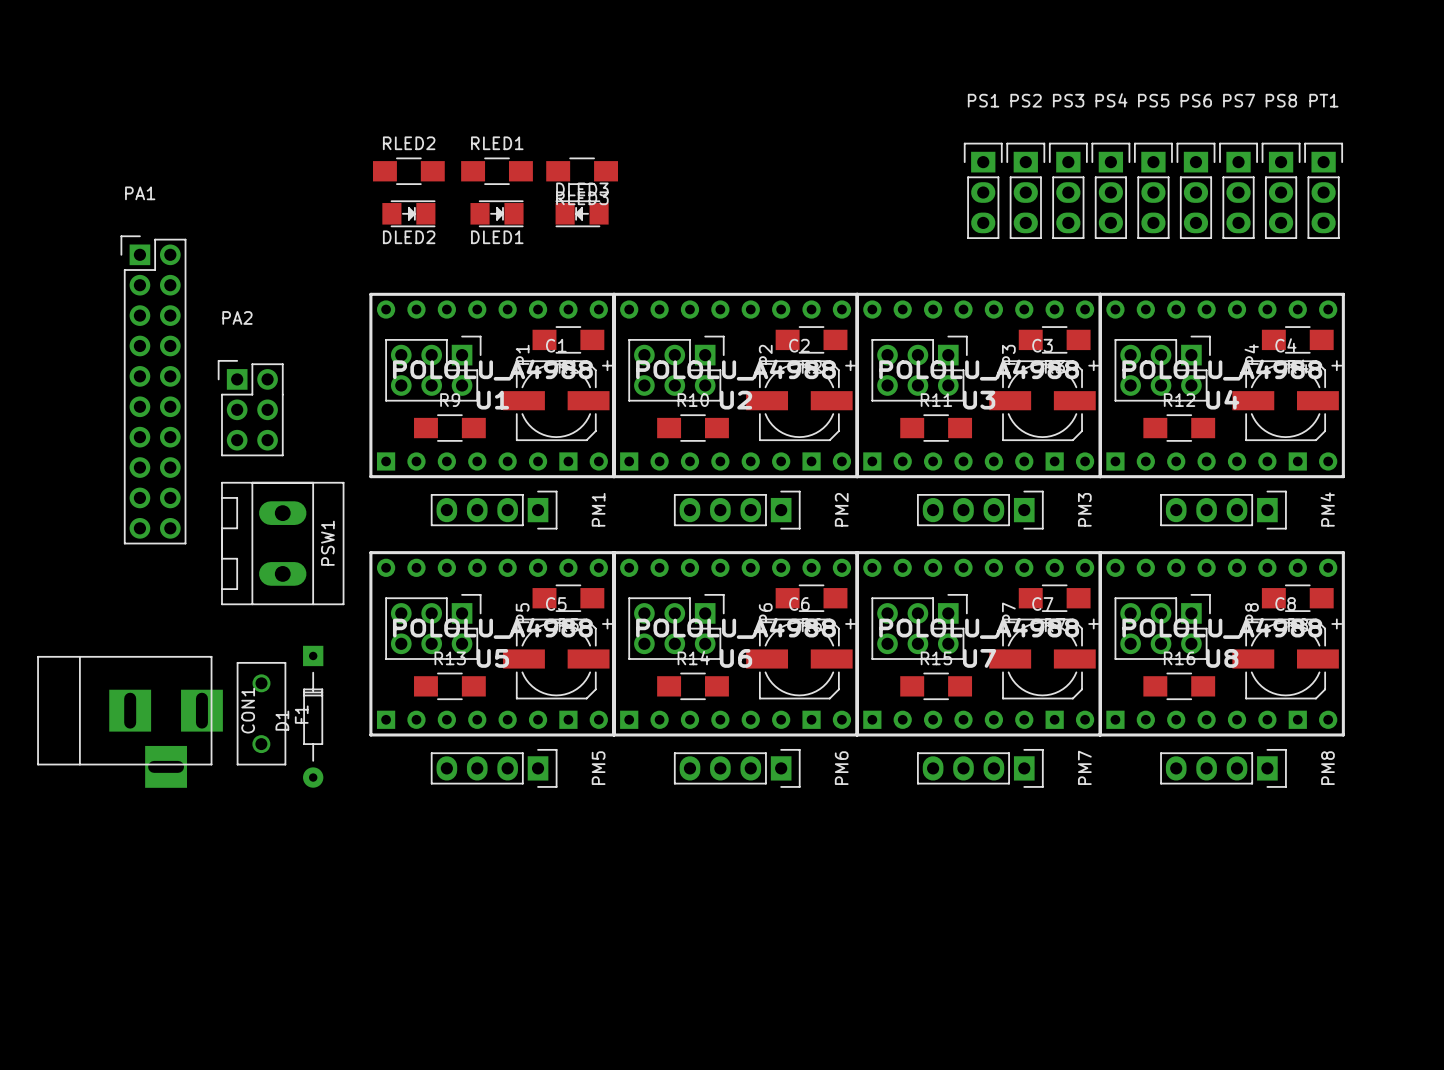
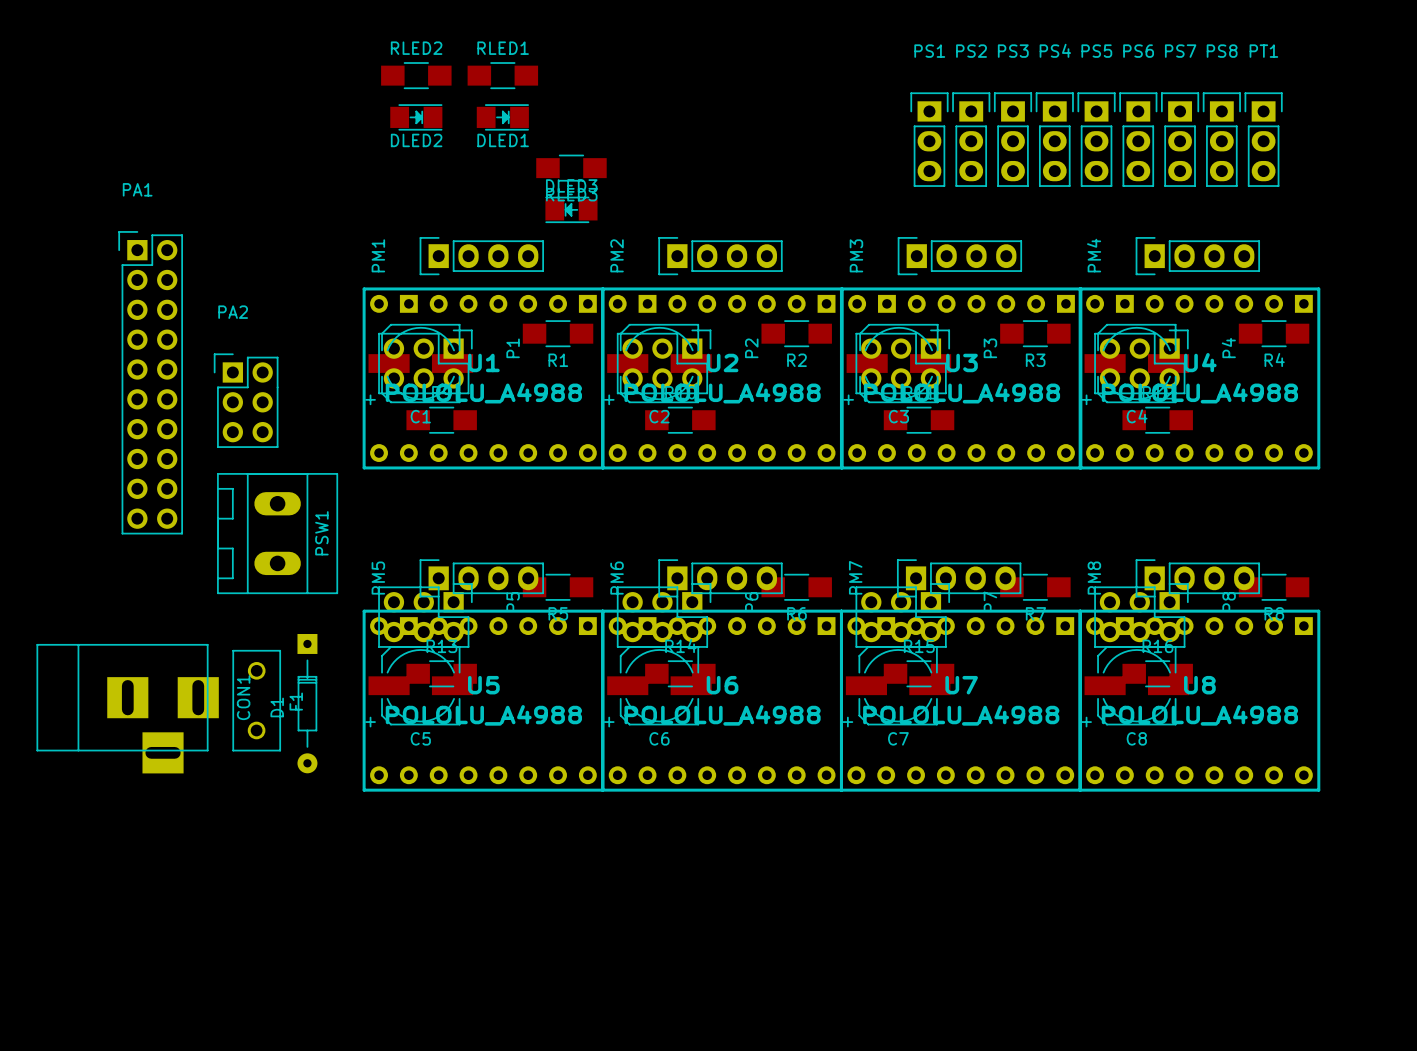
RLED2 position: (408, 171) -> (416, 75)
RLED1 position: (497, 171) -> (502, 75)
PS1 position: (983, 190) -> (929, 139)
PS2 position: (1025, 190) -> (971, 139)
PS3 position: (1068, 190) -> (1013, 139)
PS4 position: (1110, 190) -> (1054, 139)
PS5 position: (1153, 190) -> (1096, 139)
PS6 position: (1195, 190) -> (1138, 139)
PS7 position: (1238, 190) -> (1180, 139)
PS8 position: (1281, 190) -> (1221, 139)
PT1 position: (1323, 190) -> (1263, 139)
DLED2 position: (408, 213) -> (416, 117)
DLED1 position: (497, 213) -> (502, 117)
U1 rotation: 0° (492, 385) -> 180° (483, 378)
U2 rotation: 0° (735, 385) -> 180° (722, 378)
U3 rotation: 0° (978, 385) -> 180° (961, 378)
U4 rotation: 0° (1221, 385) -> 180° (1199, 378)
C1 rotation: 0° (556, 400) -> 180° (420, 363)
C1 position: (556, 400) -> (420, 363)
C2 rotation: 0° (799, 400) -> 180° (659, 363)
C2 position: (799, 400) -> (659, 363)
C3 rotation: 0° (1042, 400) -> 180° (898, 363)
C3 position: (1042, 400) -> (898, 363)
C4 rotation: 0° (1285, 400) -> 180° (1136, 363)
C4 position: (1285, 400) -> (1136, 363)
PM1 rotation: 0° (494, 510) -> 180° (481, 256)
PM1 position: (494, 510) -> (481, 256)
PM2 rotation: 0° (737, 510) -> 180° (720, 256)
PM2 position: (737, 510) -> (720, 256)
PM3 rotation: 0° (980, 510) -> 180° (959, 256)
PM3 position: (980, 510) -> (959, 256)
PM4 rotation: 0° (1223, 510) -> 180° (1197, 256)
PM4 position: (1223, 510) -> (1197, 256)
U5 rotation: 0° (492, 643) -> 180° (483, 700)
U6 rotation: 0° (735, 643) -> 180° (722, 700)
U7 rotation: 0° (978, 643) -> 180° (960, 700)
U8 rotation: 0° (1221, 643) -> 180° (1199, 700)
C5 rotation: 0° (556, 659) -> 180° (420, 685)
C5 position: (556, 659) -> (420, 685)
C6 rotation: 0° (799, 659) -> 180° (659, 685)
C6 position: (799, 659) -> (659, 685)
C7 rotation: 0° (1042, 659) -> 180° (898, 685)
C7 position: (1042, 659) -> (898, 685)
C8 rotation: 0° (1285, 659) -> 180° (1136, 685)
C8 position: (1285, 659) -> (1136, 685)
PM5 rotation: 0° (494, 768) -> 180° (481, 578)
PM5 position: (494, 768) -> (481, 578)
PM6 rotation: 0° (737, 768) -> 180° (720, 578)
PM6 position: (737, 768) -> (720, 578)
PM7 rotation: 0° (980, 768) -> 180° (959, 578)
PM7 position: (980, 768) -> (959, 578)
PM8 rotation: 0° (1223, 768) -> 180° (1197, 578)
PM8 position: (1223, 768) -> (1197, 578)

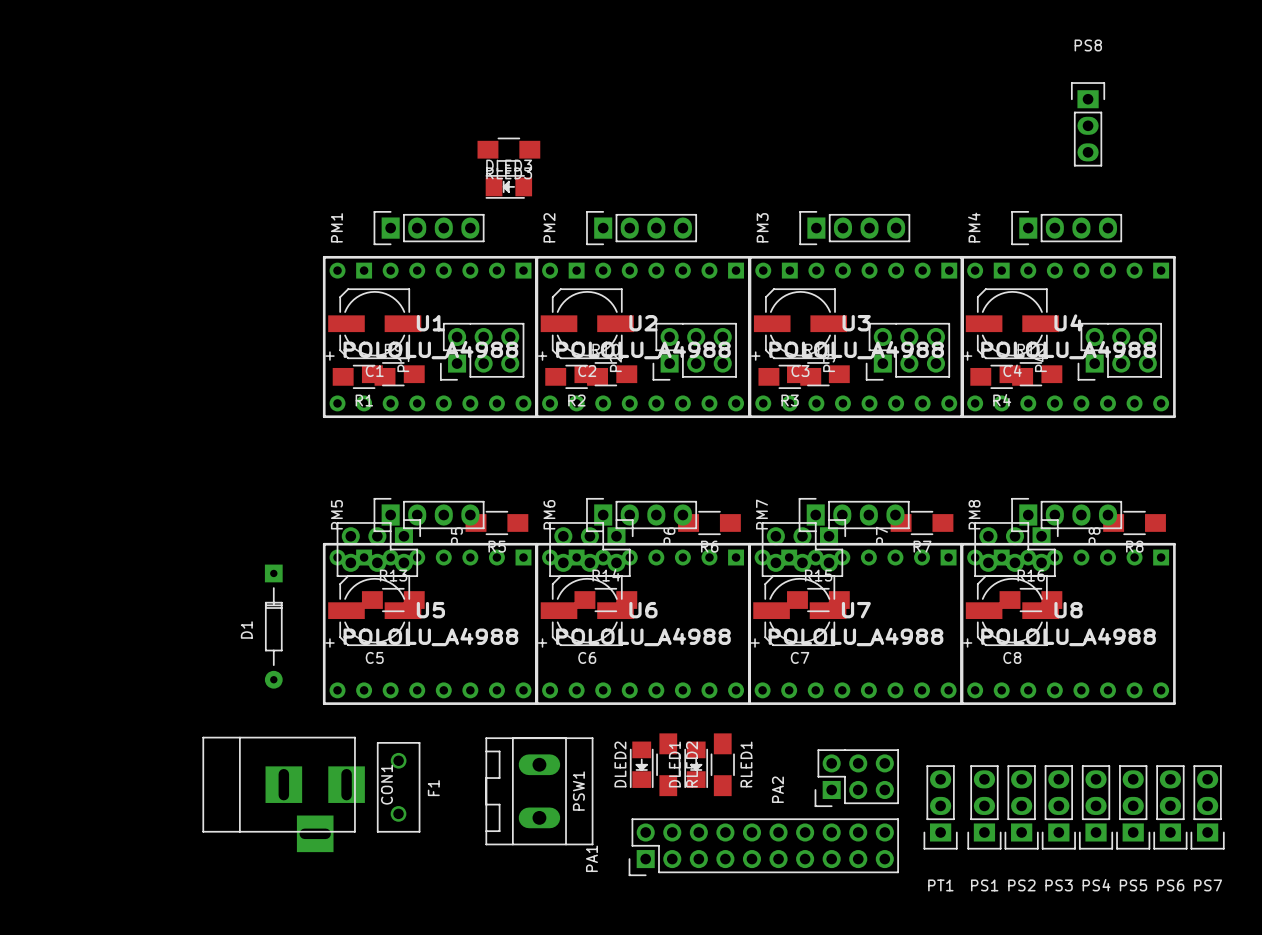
RLED2 rotation: 0° (416, 75) -> 90° clockwise (668, 764)
RLED2 position: (416, 75) -> (668, 764)
RLED1 rotation: 0° (502, 75) -> 90° clockwise (722, 764)
RLED1 position: (502, 75) -> (722, 764)
DLED2 rotation: 0° (416, 117) -> 90° clockwise (641, 764)
DLED2 position: (416, 117) -> (641, 764)
DLED1 rotation: 0° (502, 117) -> 90° clockwise (696, 764)
DLED1 position: (502, 117) -> (696, 764)
PS1 rotation: 0° (929, 139) -> 180° (984, 807)
PS1 position: (929, 139) -> (984, 807)
PS2 rotation: 0° (971, 139) -> 180° (1021, 807)
PS2 position: (971, 139) -> (1021, 807)
PS3 rotation: 0° (1013, 139) -> 180° (1058, 807)
PS3 position: (1013, 139) -> (1058, 807)
PS4 rotation: 0° (1054, 139) -> 180° (1096, 807)
PS4 position: (1054, 139) -> (1096, 807)
PS5 rotation: 0° (1096, 139) -> 180° (1133, 807)
PS5 position: (1096, 139) -> (1133, 807)
PS6 rotation: 0° (1138, 139) -> 180° (1170, 807)
PS6 position: (1138, 139) -> (1170, 807)
PS7 rotation: 0° (1180, 139) -> 180° (1207, 807)
PS7 position: (1180, 139) -> (1207, 807)
PT1 rotation: 0° (1263, 139) -> 180° (940, 807)
PT1 position: (1263, 139) -> (940, 807)
R1 position: (558, 333) -> (364, 376)
R2 position: (796, 333) -> (576, 376)
R3 position: (1035, 333) -> (789, 376)
R4 position: (1274, 333) -> (1001, 376)
P1 rotation: 0° (425, 361) -> 180° (482, 351)
P1 position: (425, 361) -> (482, 351)
P2 rotation: 0° (664, 361) -> 180° (694, 351)
P2 position: (664, 361) -> (694, 351)
P3 rotation: 0° (902, 361) -> 180° (907, 351)
P3 position: (902, 361) -> (907, 351)
P4 rotation: 0° (1141, 361) -> 180° (1119, 351)
P4 position: (1141, 361) -> (1119, 351)
PA1 rotation: 0° (150, 382) -> 90° counterclockwise (763, 847)
PA1 position: (150, 382) -> (763, 847)
PA2 rotation: 0° (246, 400) -> 90° counterclockwise (856, 778)
PA2 position: (246, 400) -> (856, 778)
PSW1 position: (277, 533) -> (539, 791)
F1 position: (256, 700) -> (398, 787)
CON1 position: (127, 708) -> (283, 794)

